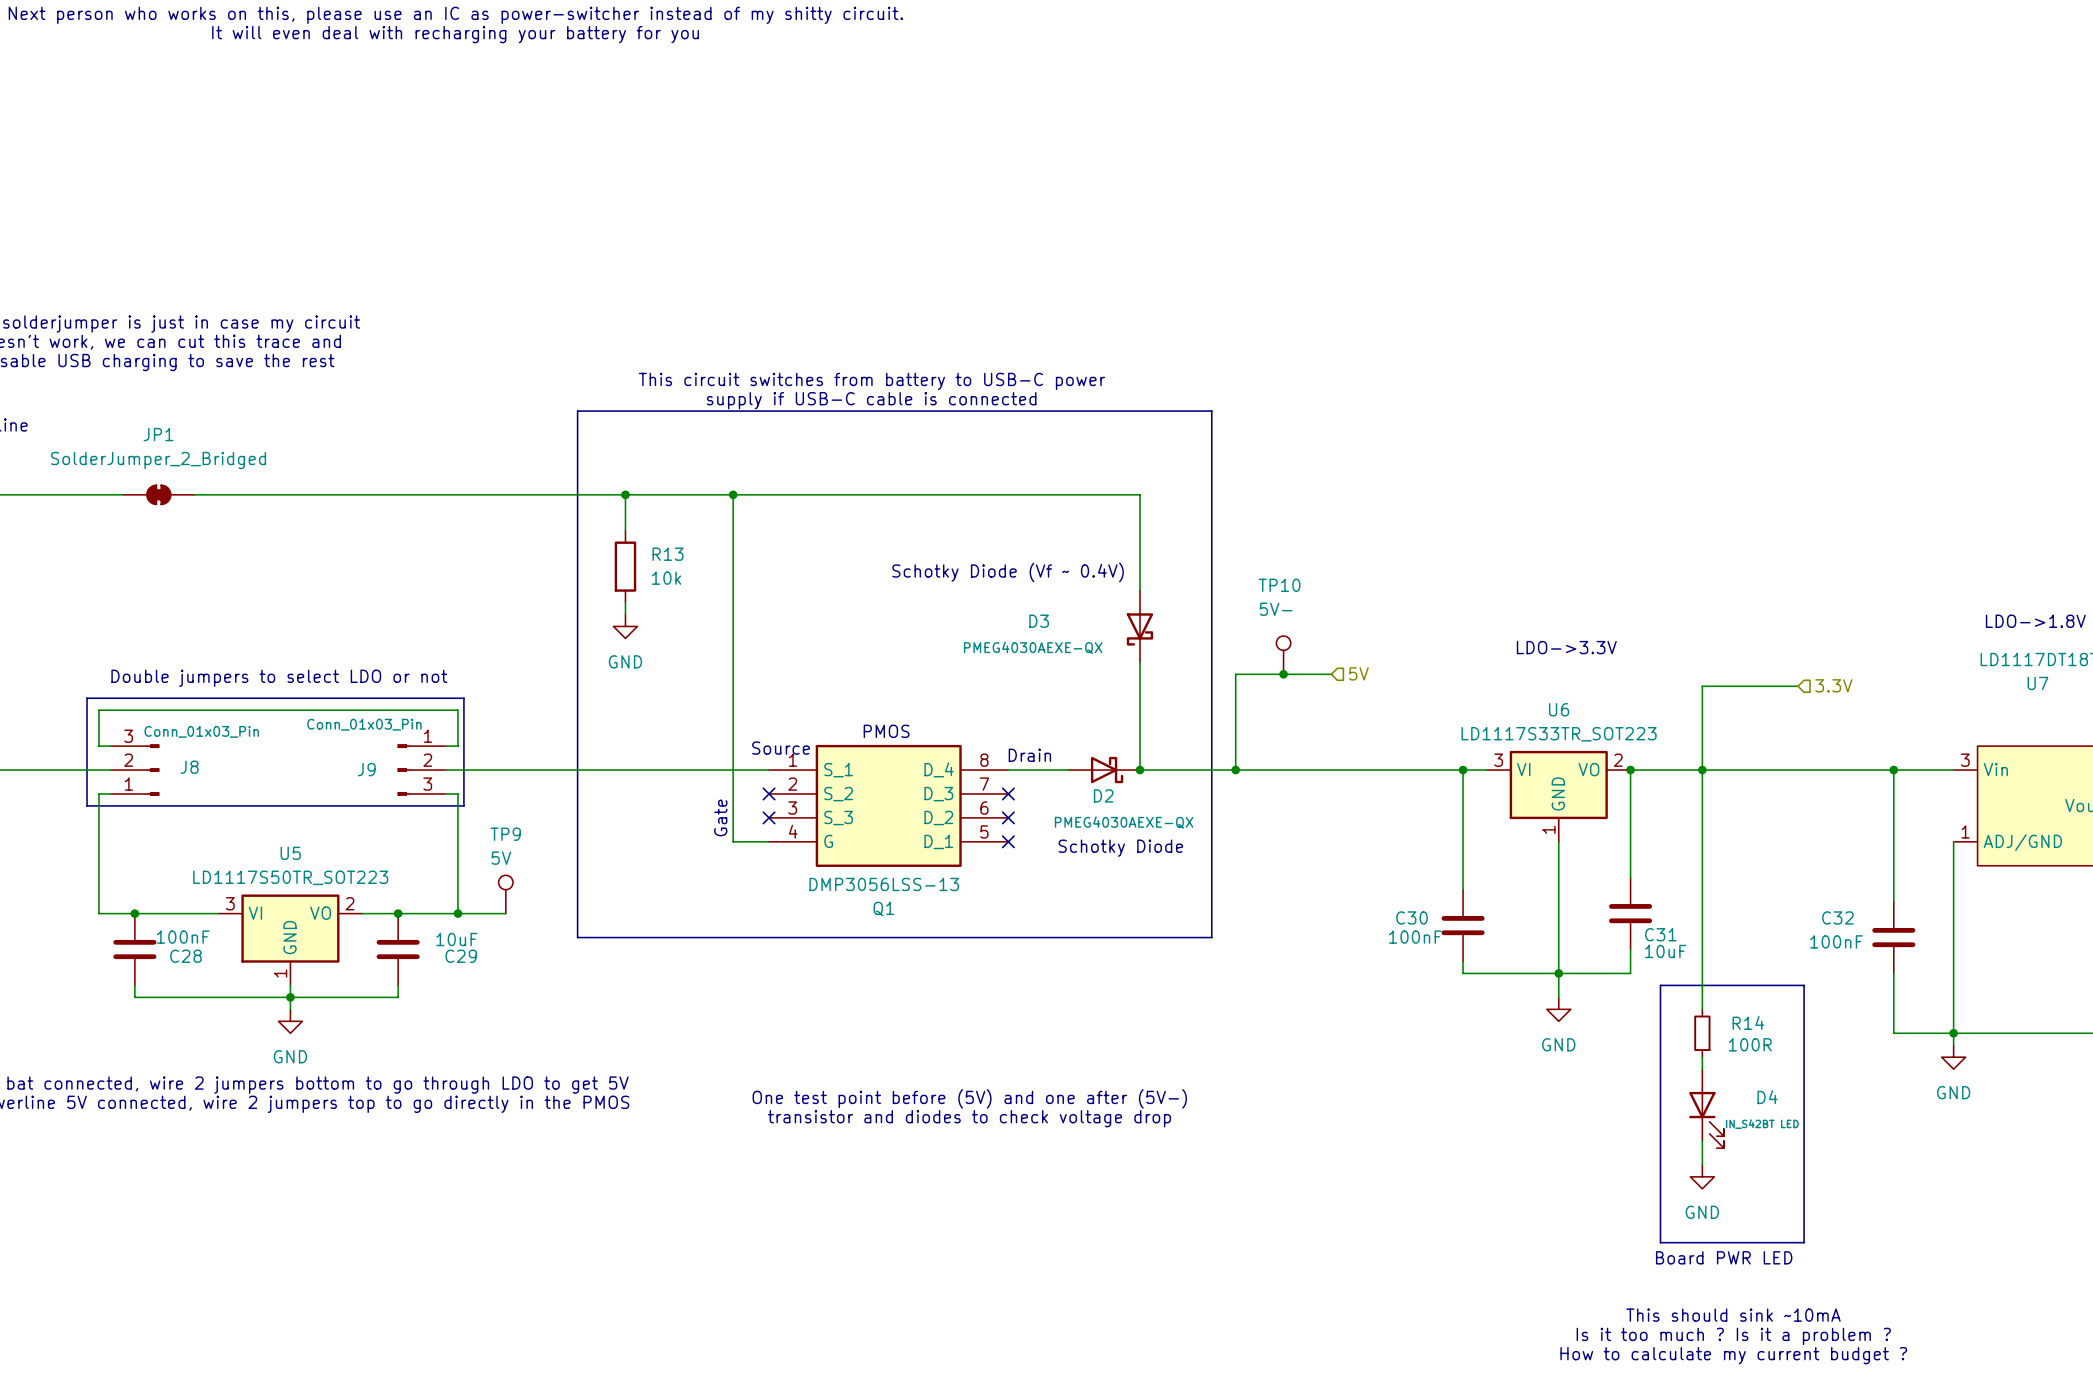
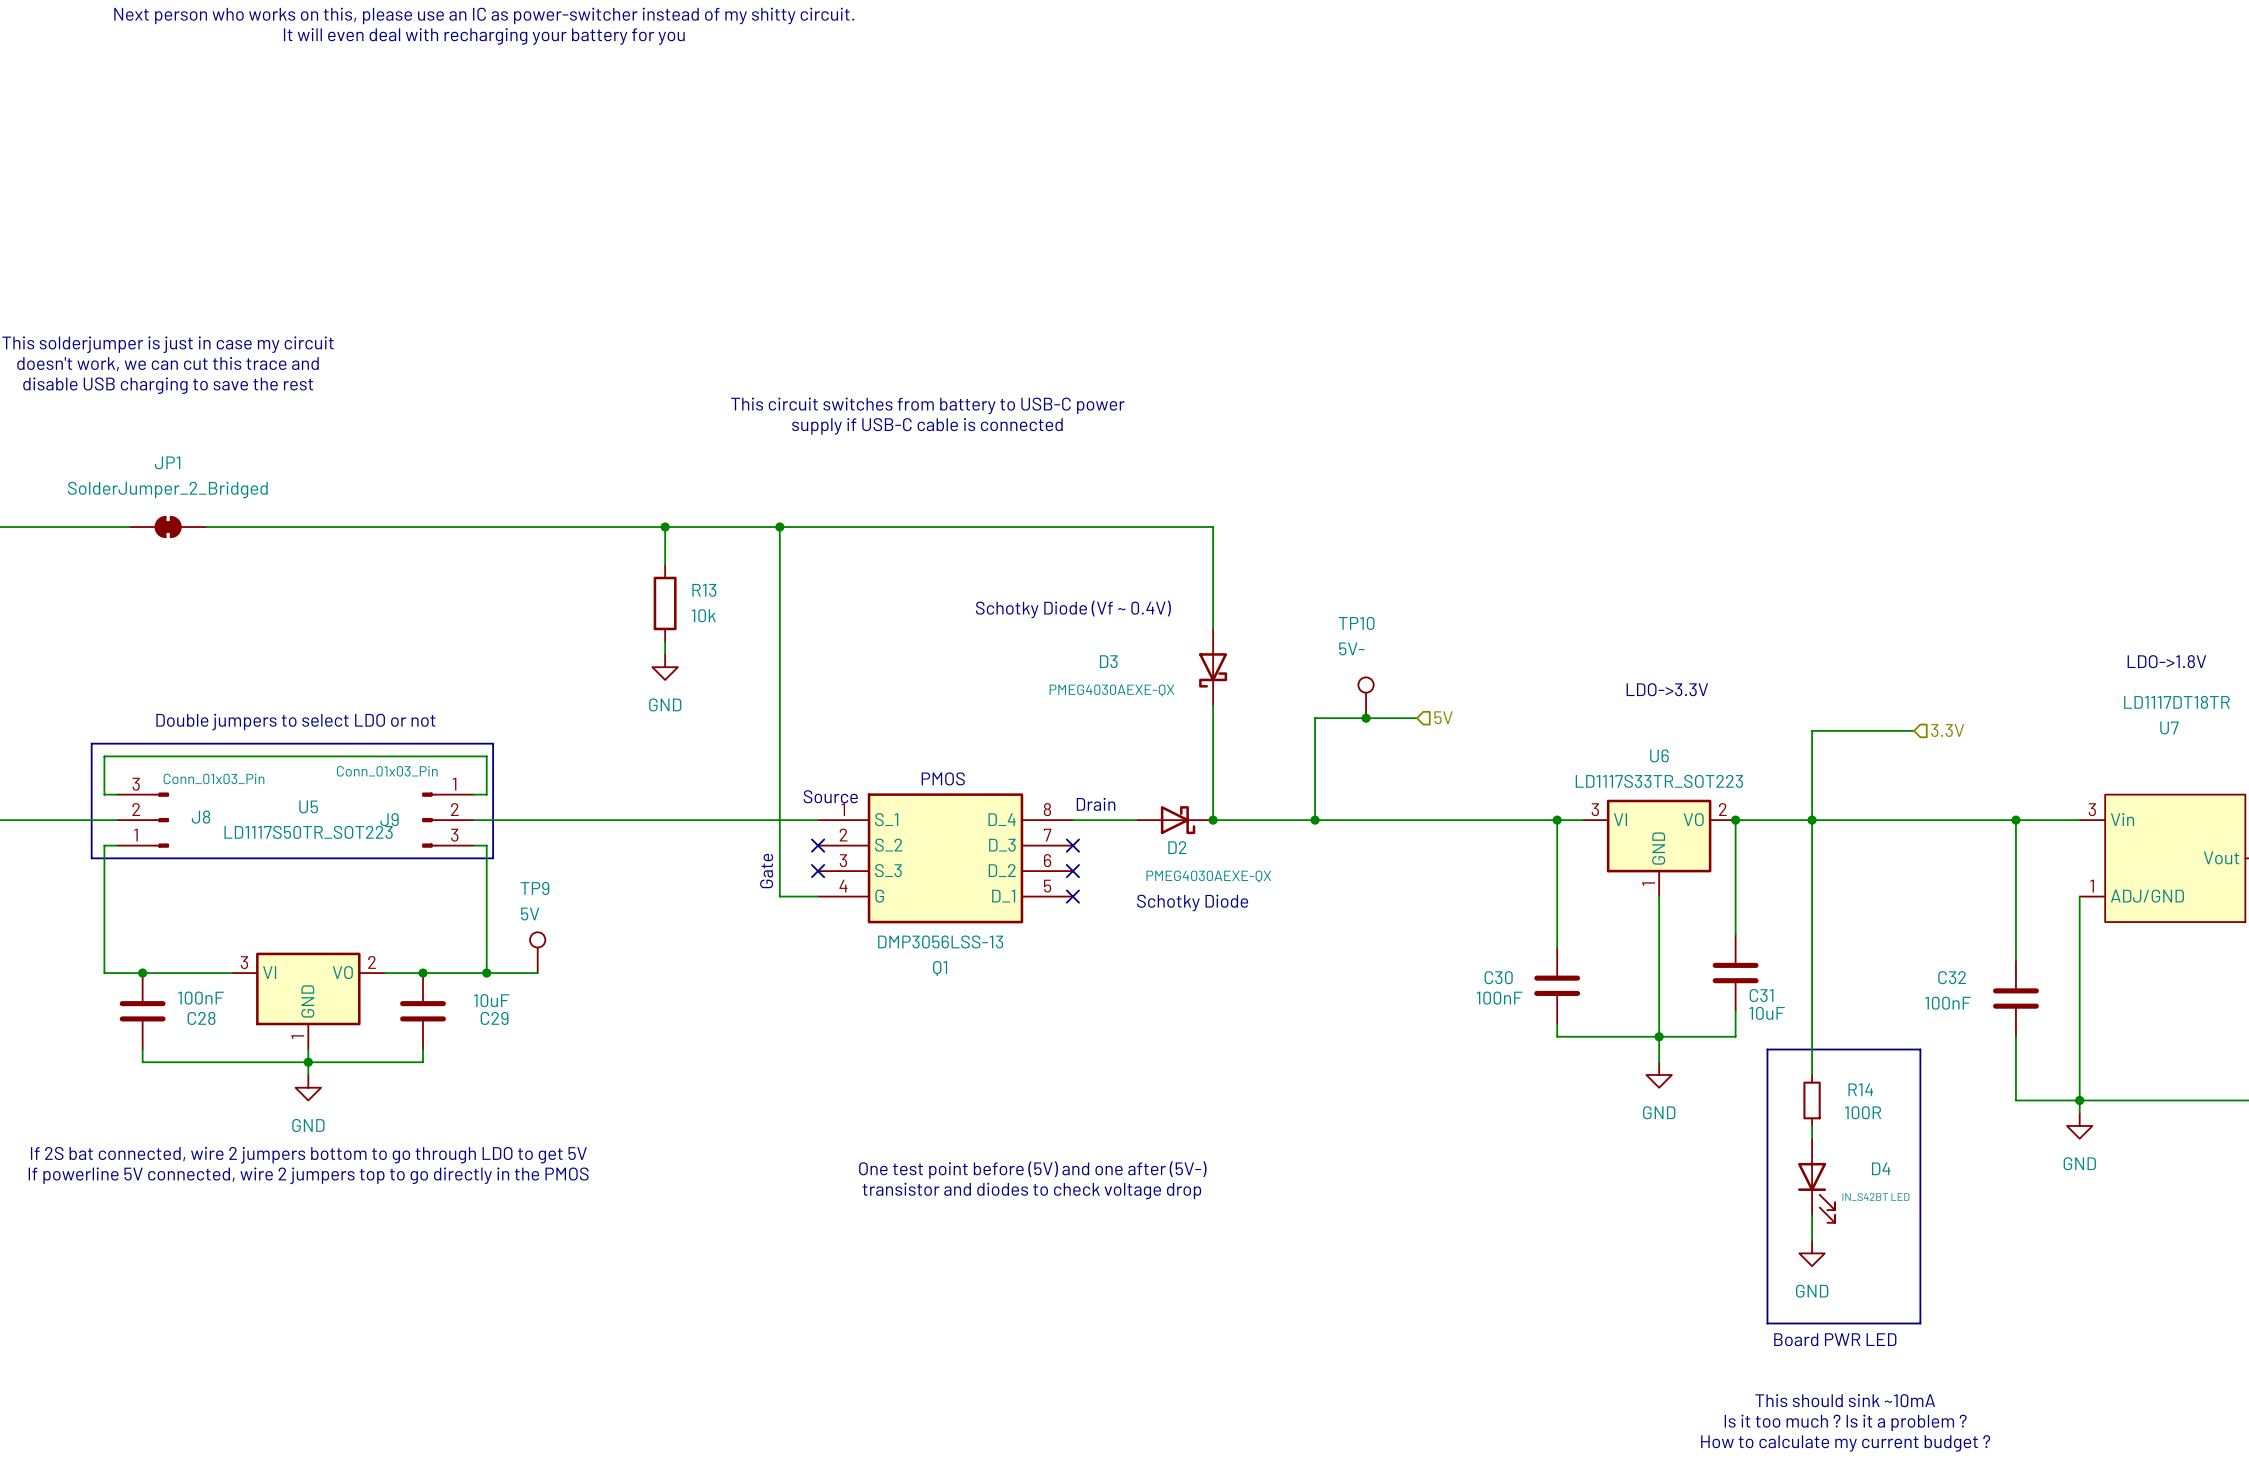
line: (577, 411) (1211, 411) (1211, 937) (577, 937) (577, 411) -> none
U5 name position: U5 (290, 853) -> U5 (308, 806)
U5 value position: LD1117S50TR_SOT223 (290, 877) -> LD1117S50TR_SOT223 (308, 832)

